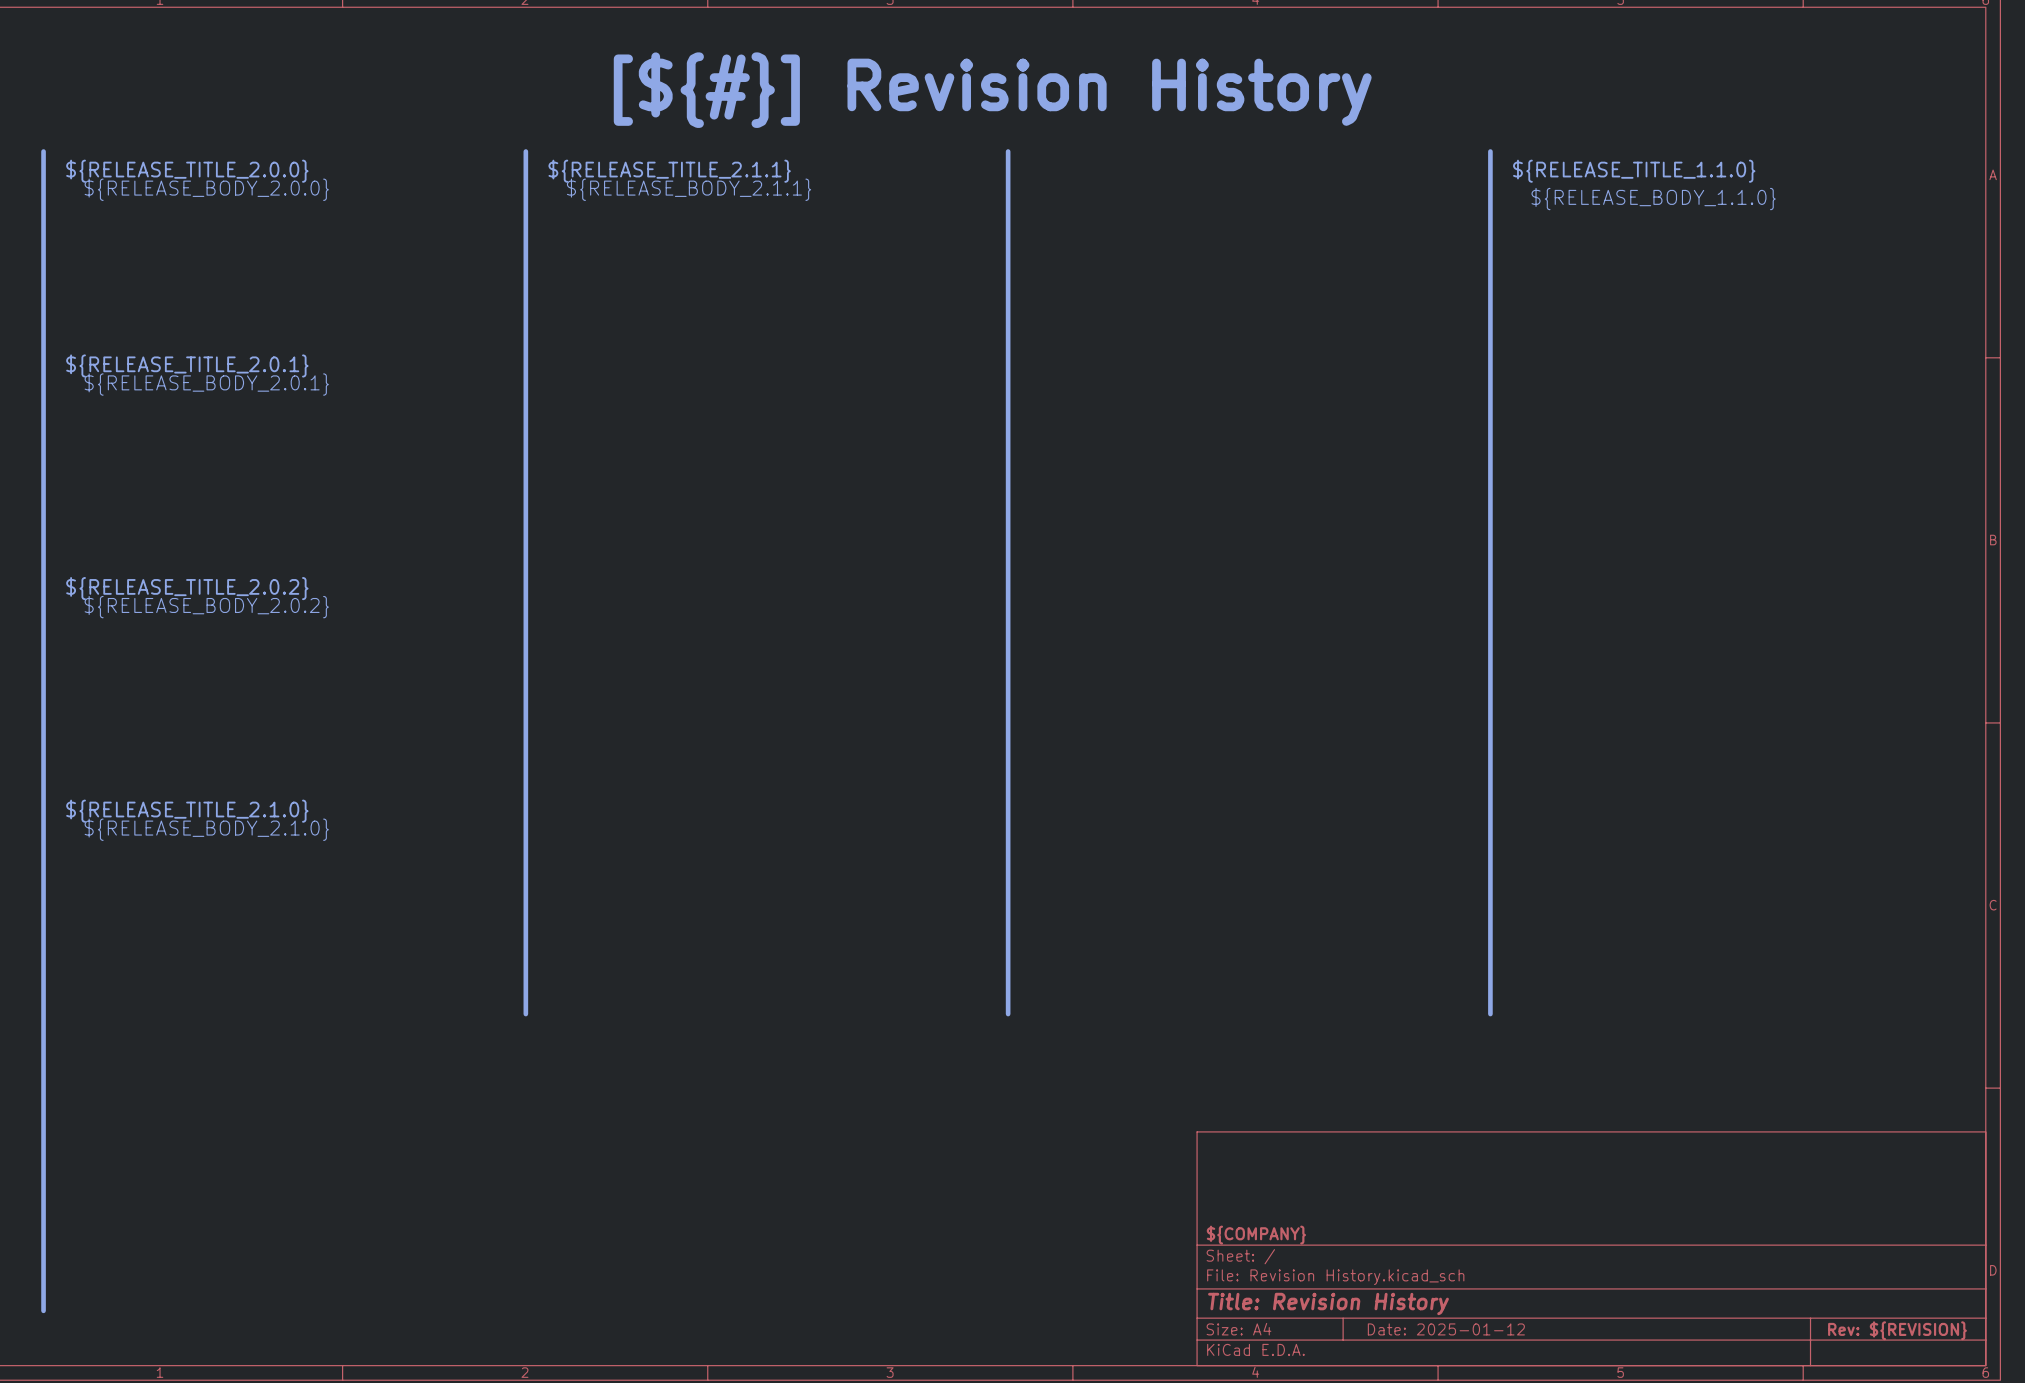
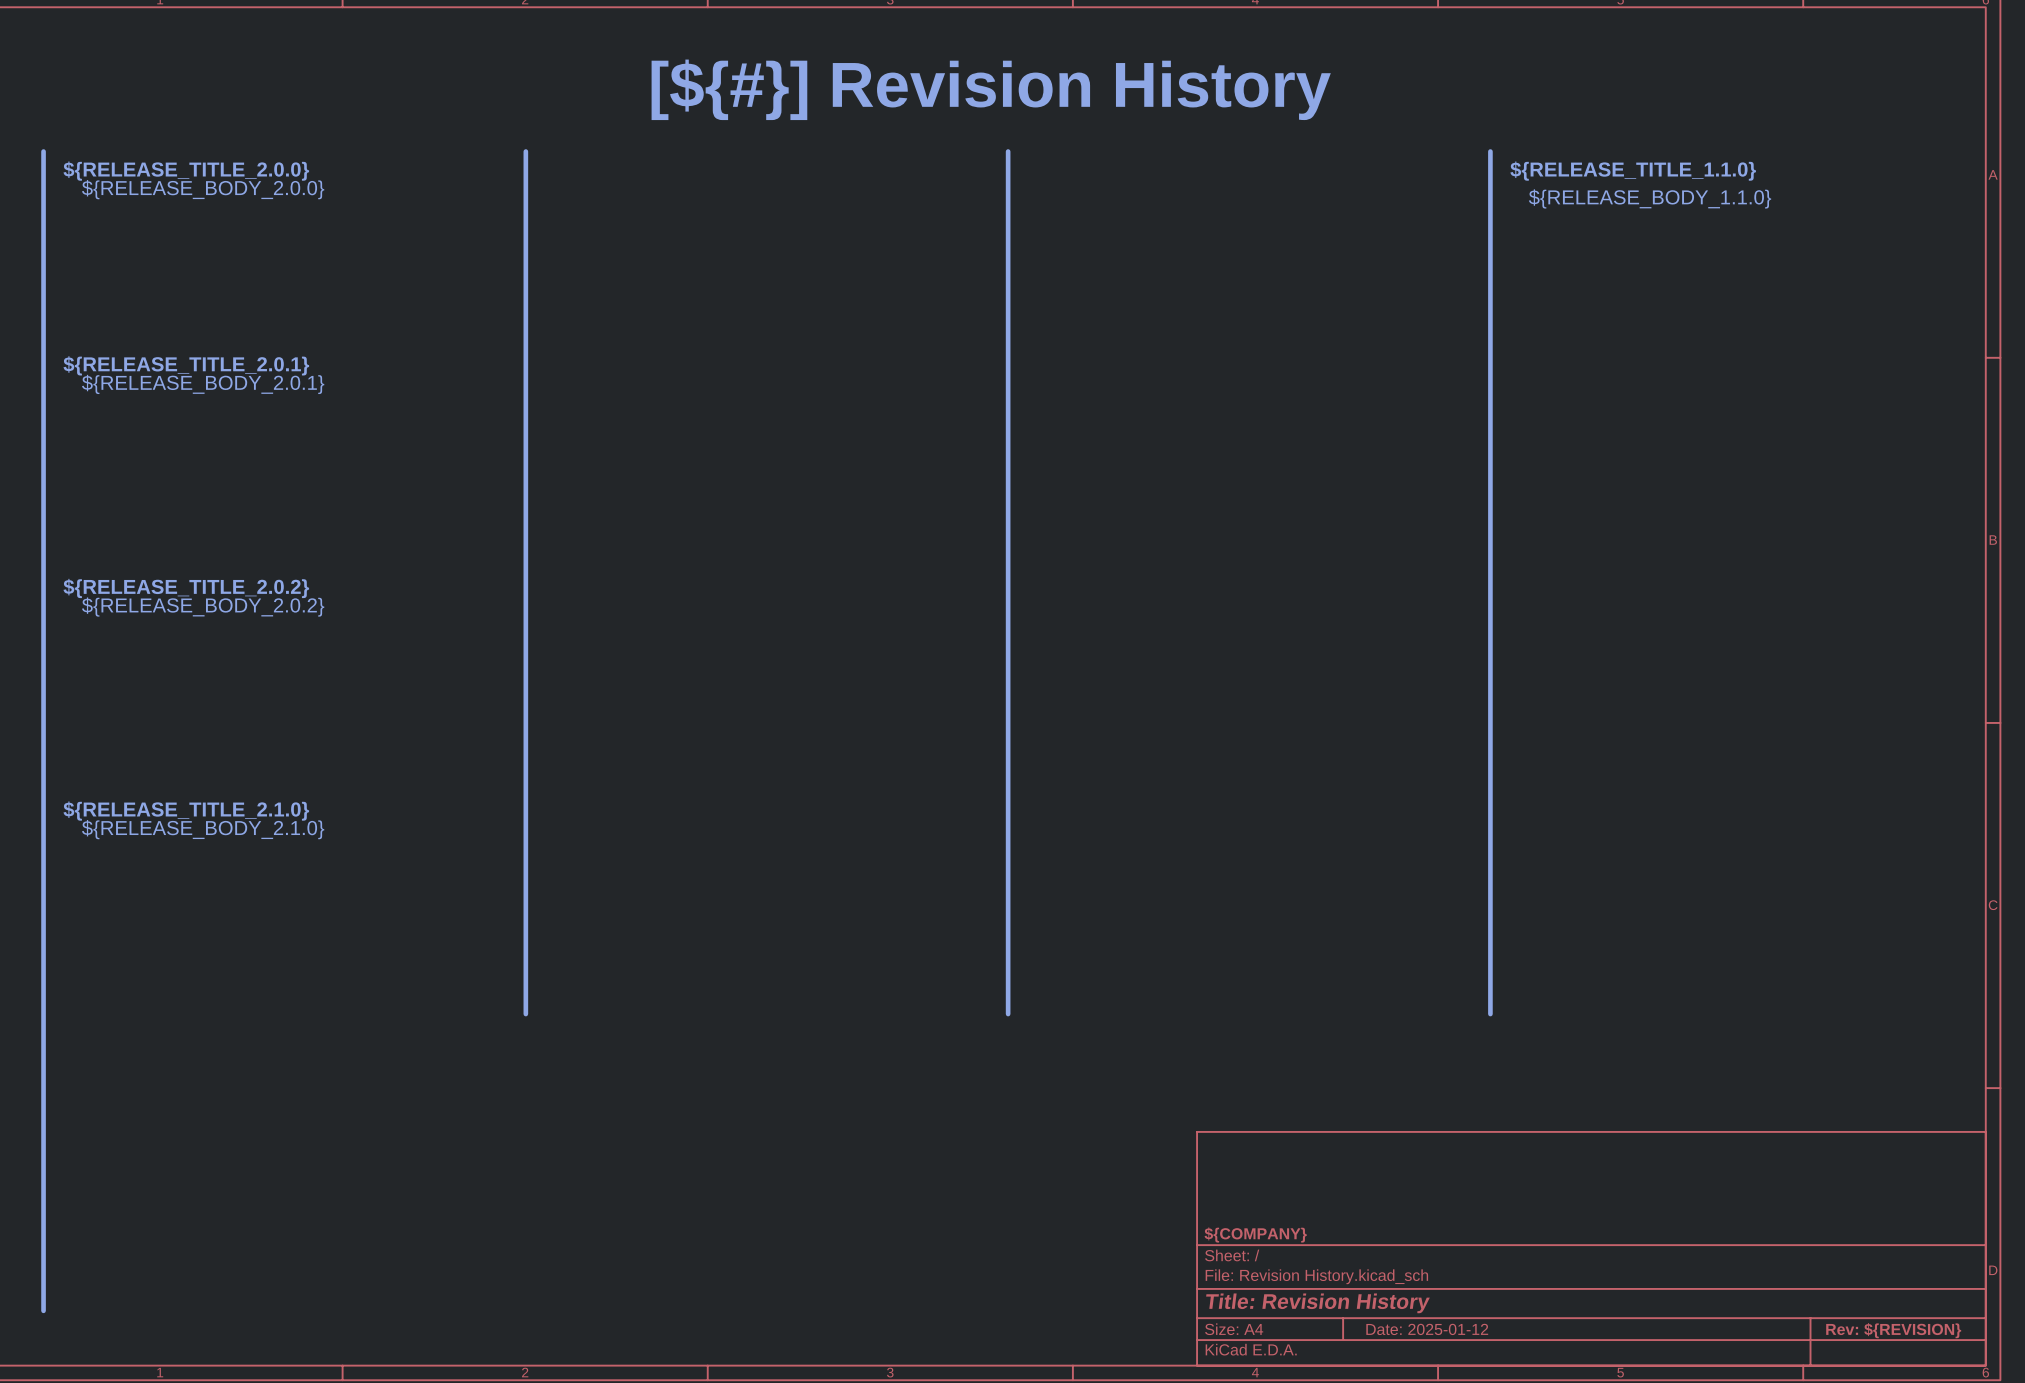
text: ${RELEASE_TITLE_2.1.1} (669, 171) -> none
text: ${RELEASE_BODY_2.1.1} (689, 189) -> none

